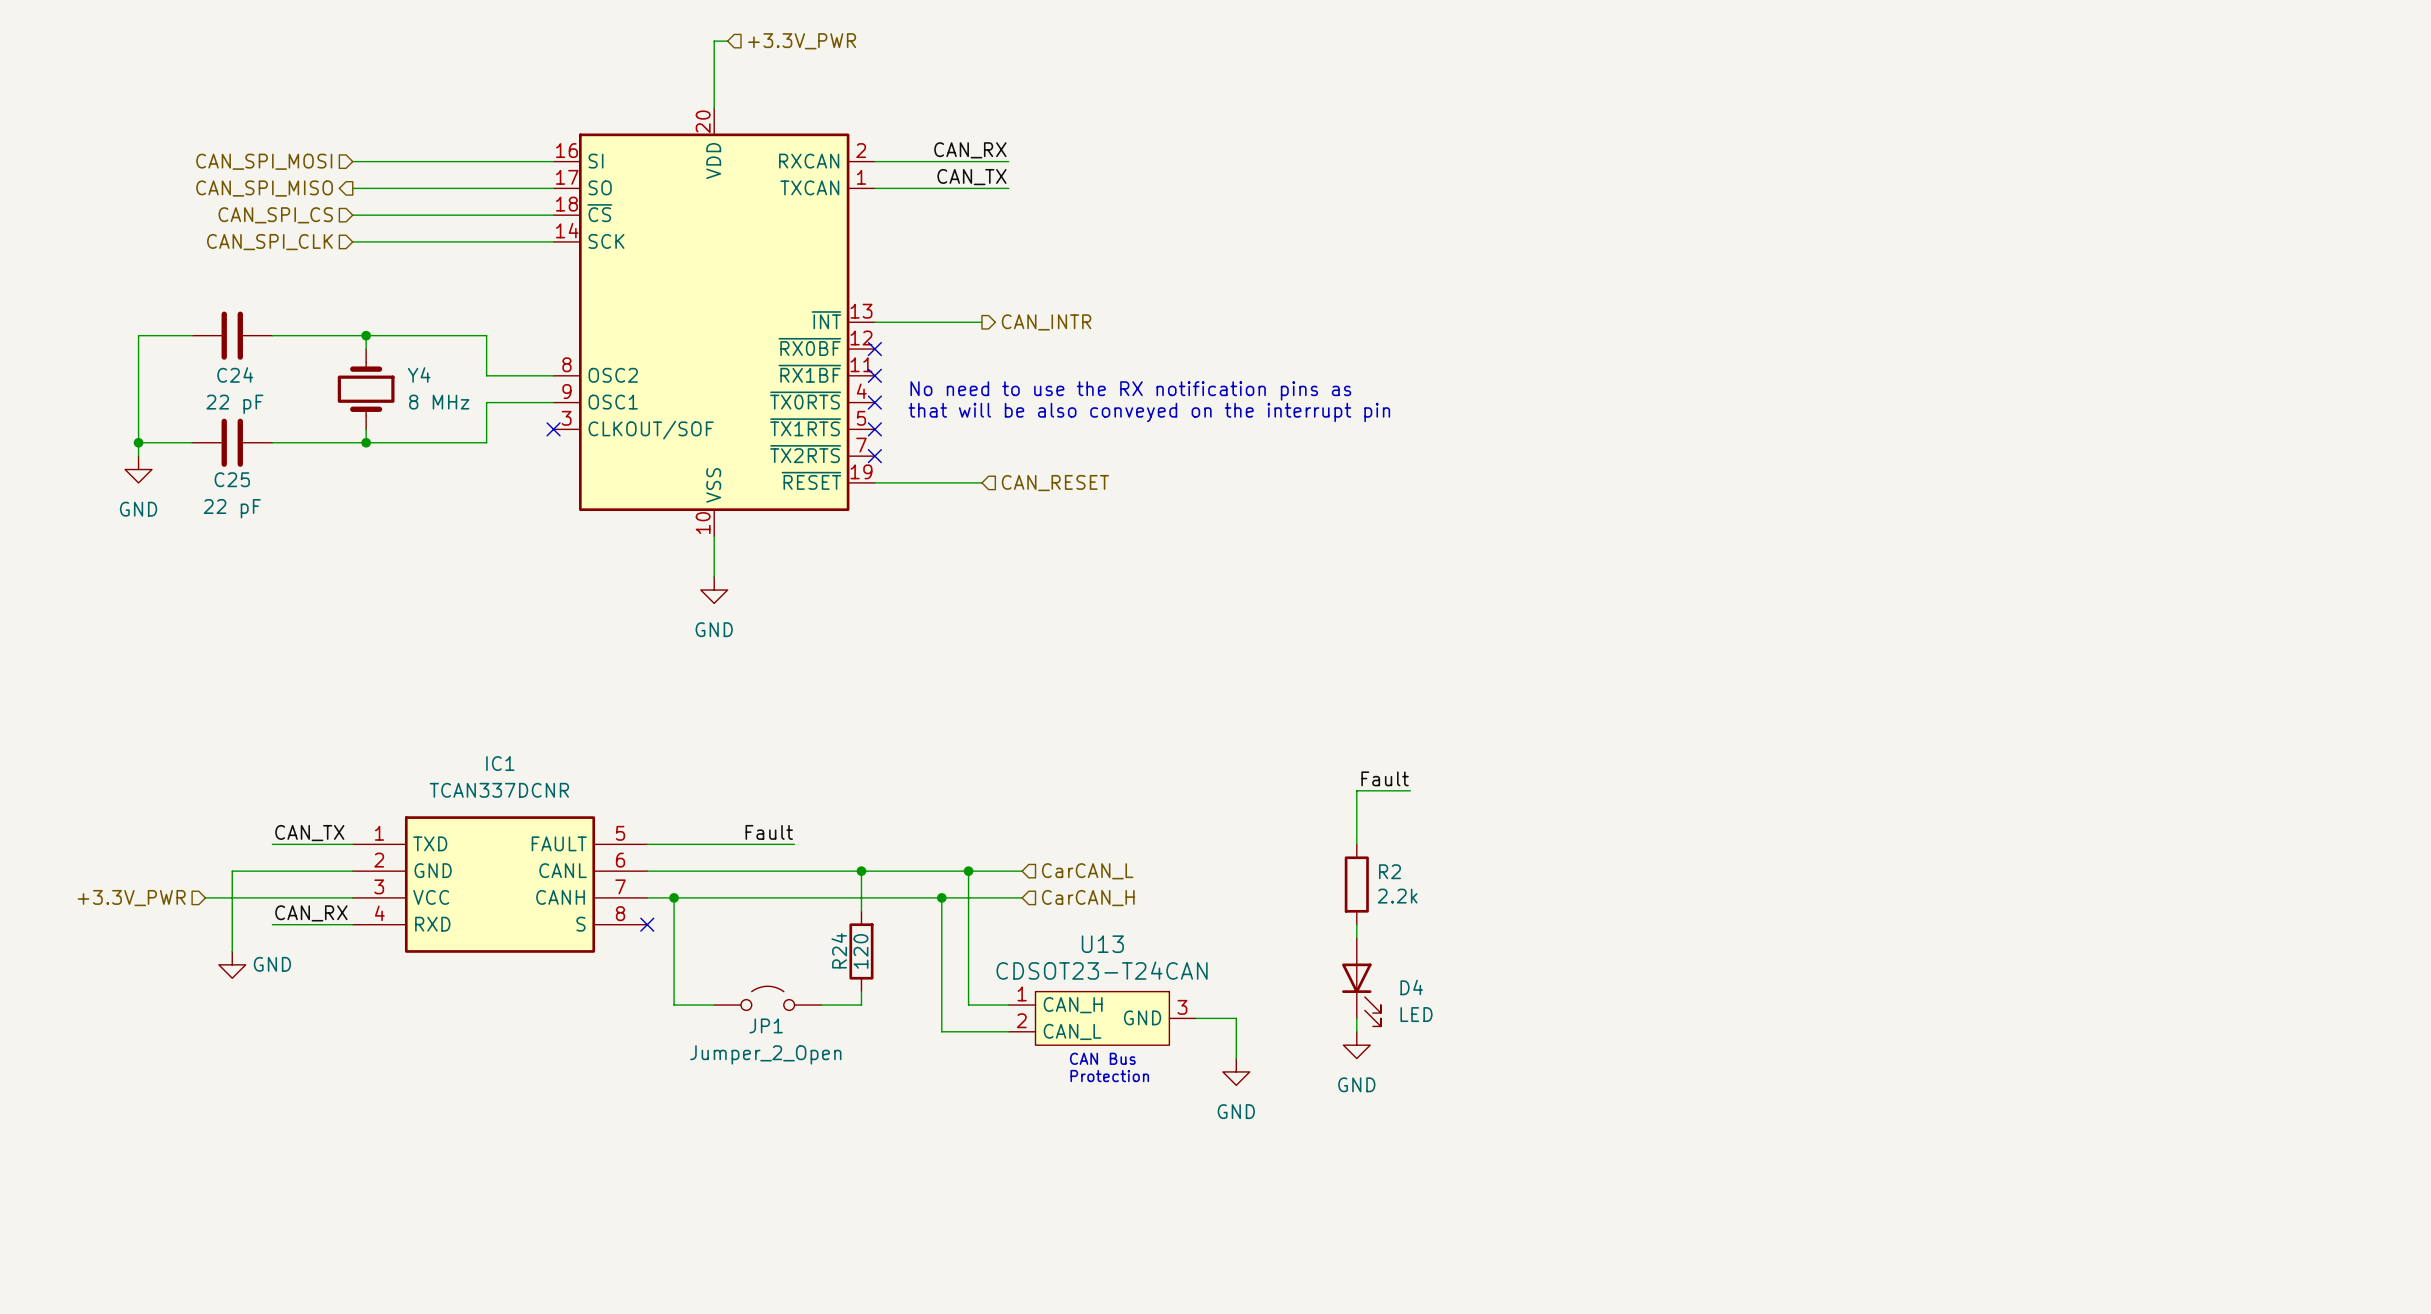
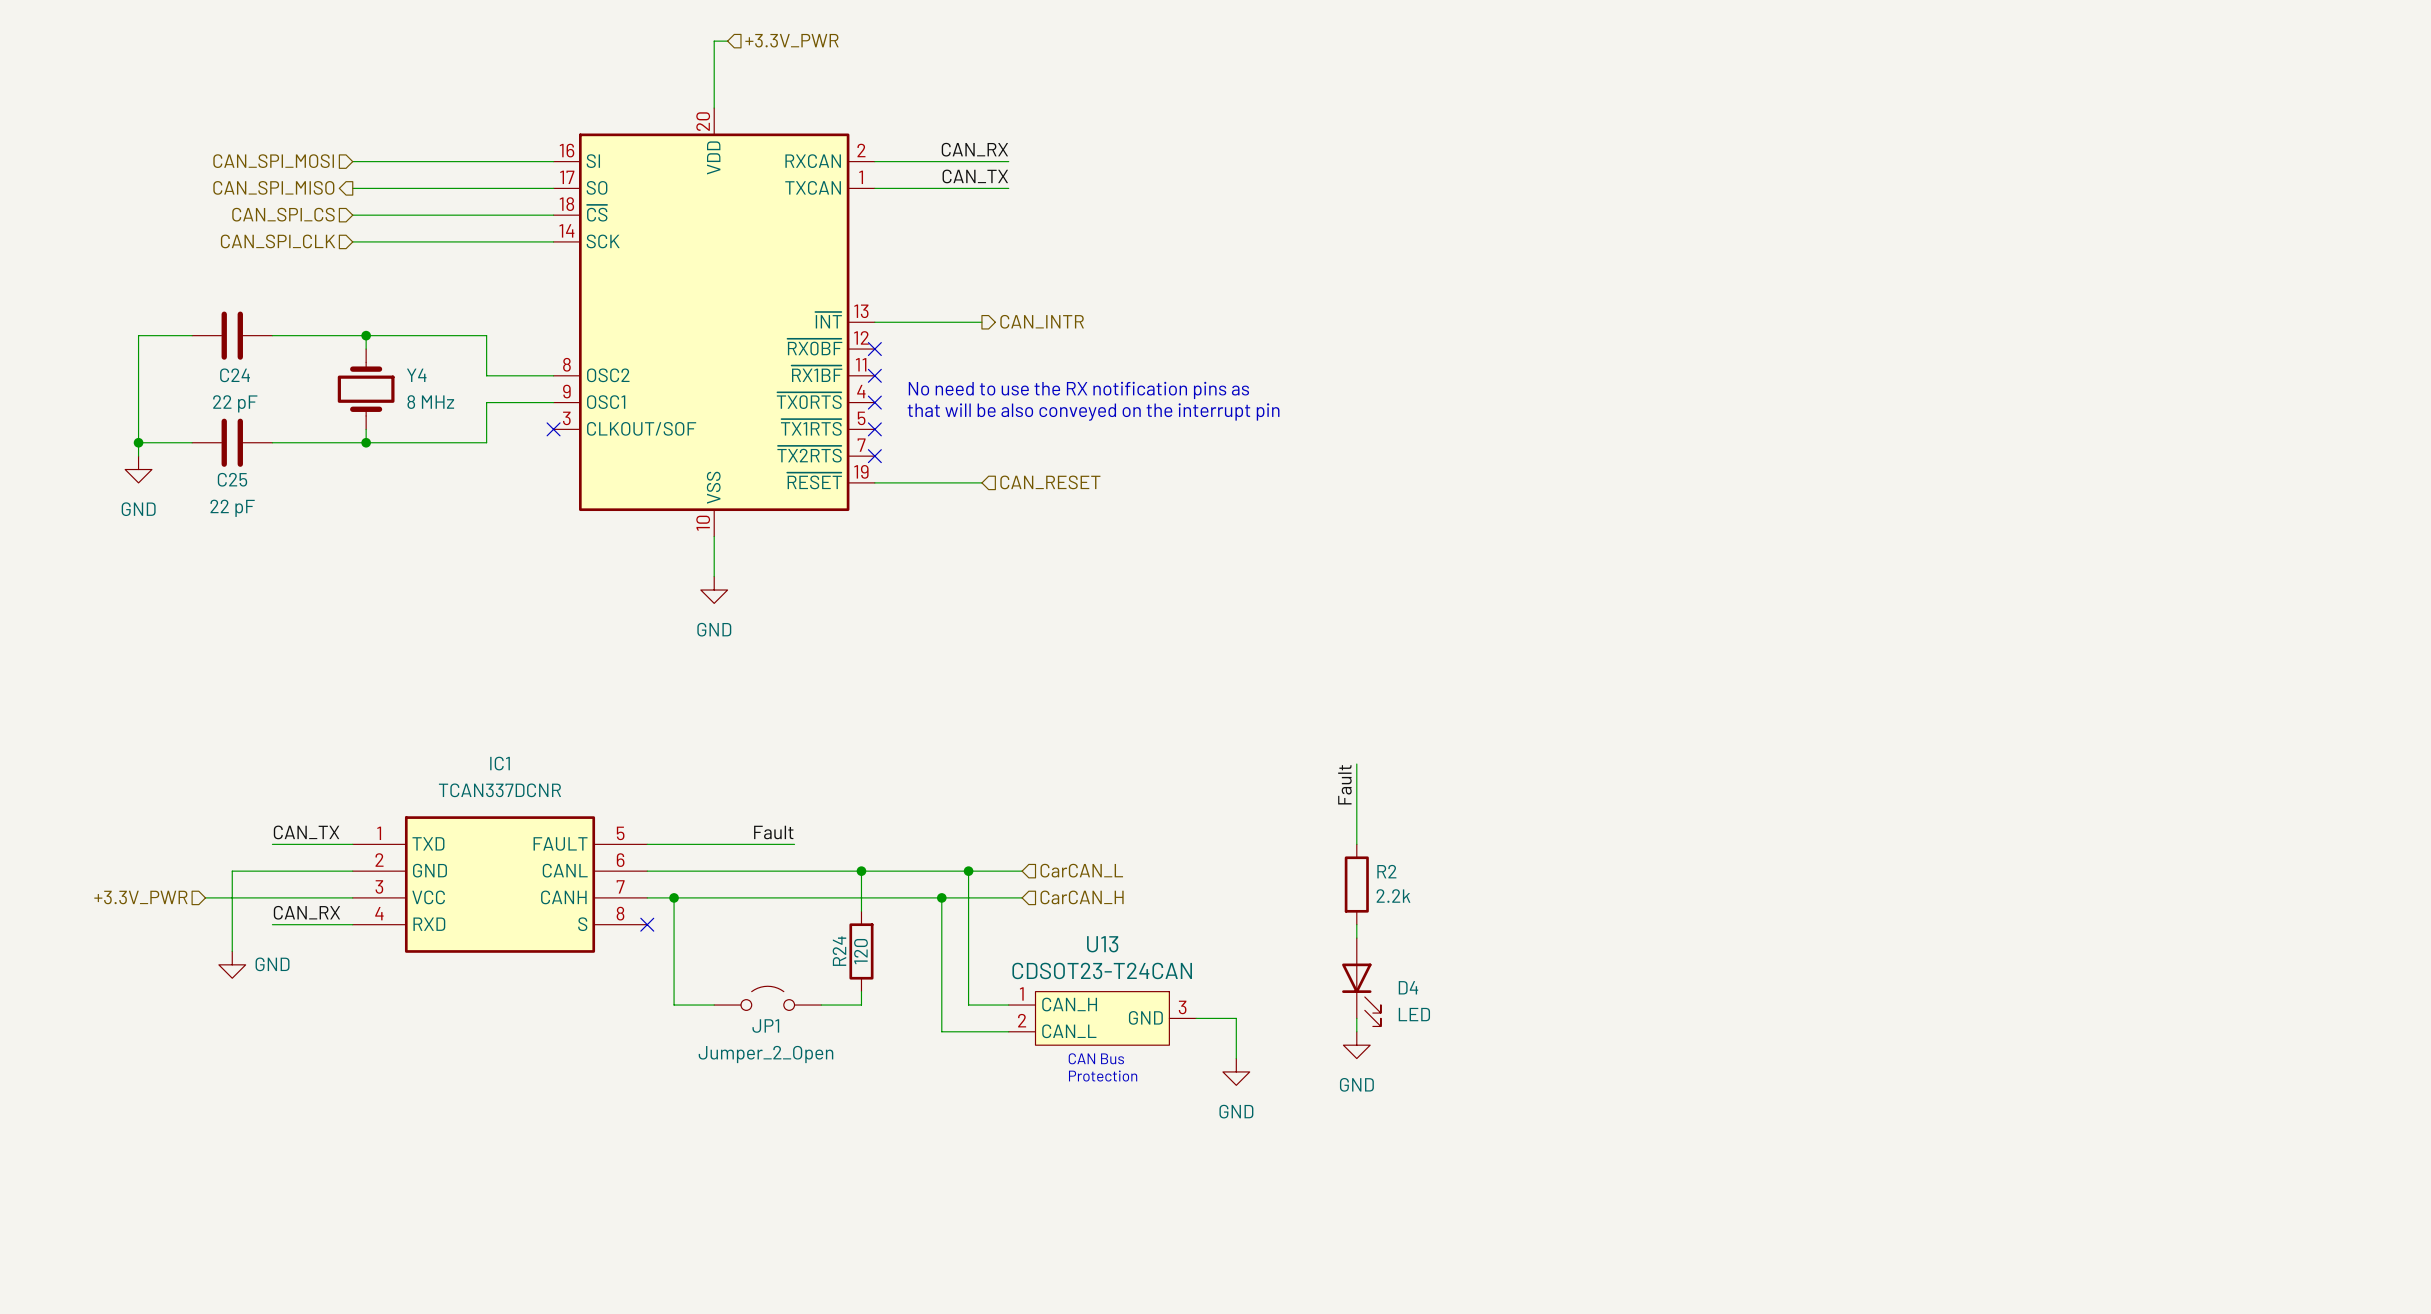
label rotation: 0° (1385, 778) -> 90° counterclockwise (1344, 784)
wire: (1356, 790) (1410, 790) -> (1356, 790) (1356, 764)

